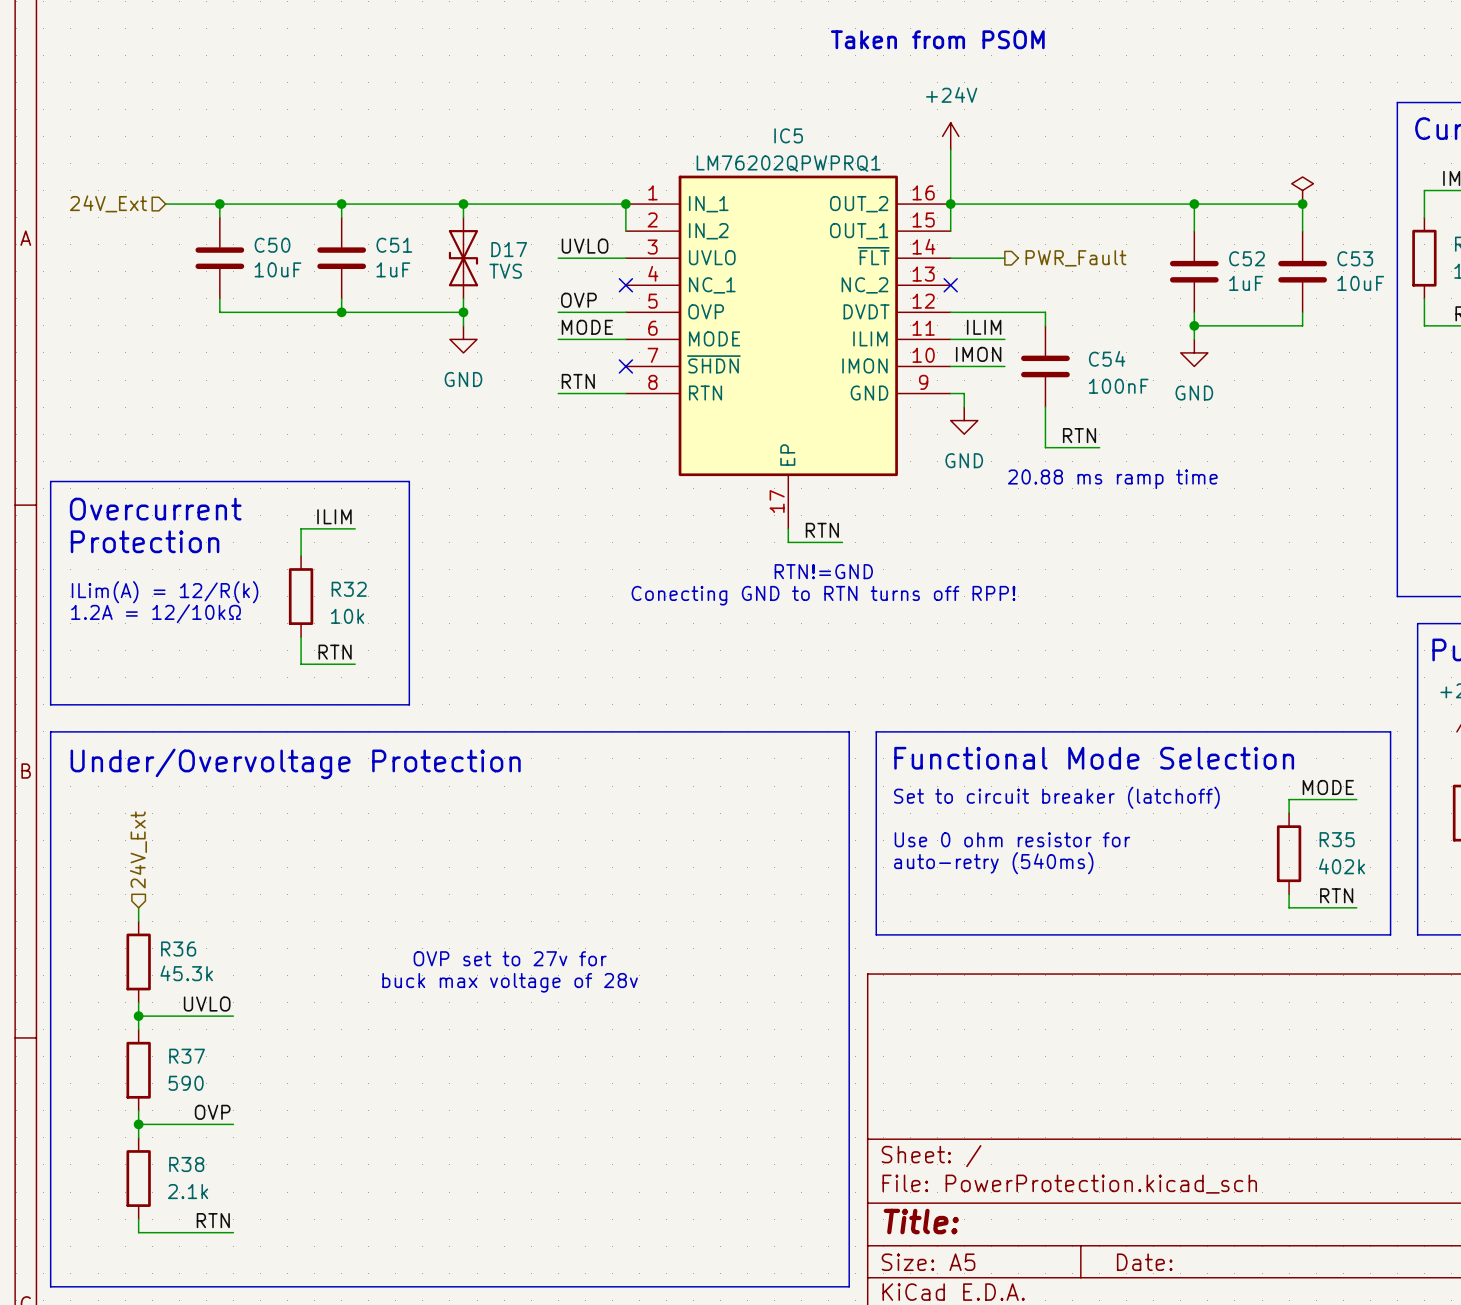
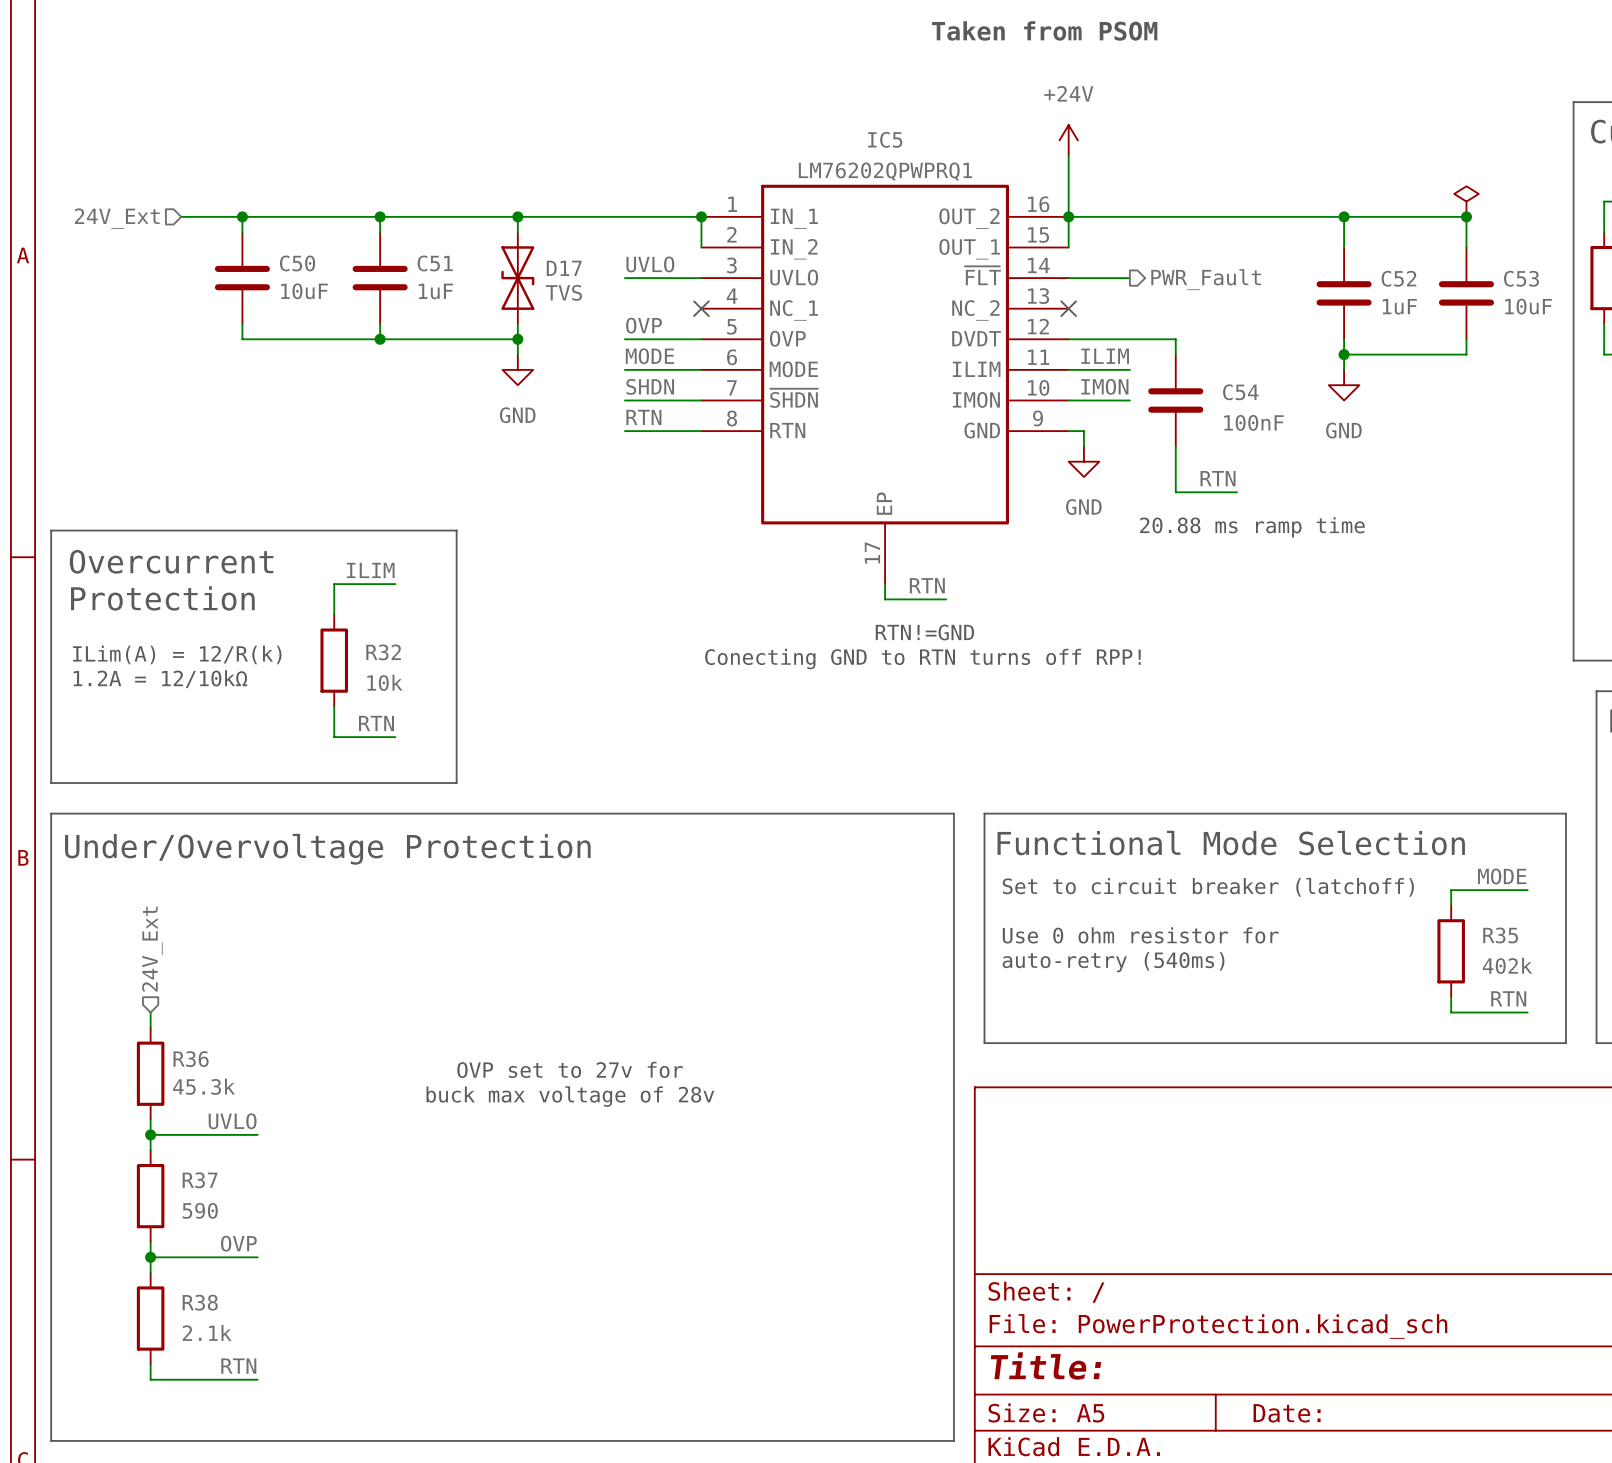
label: none -> SHDN (650, 386)
wire: none -> (624, 400) (701, 400)
no-connect mark: (625, 366) -> none

